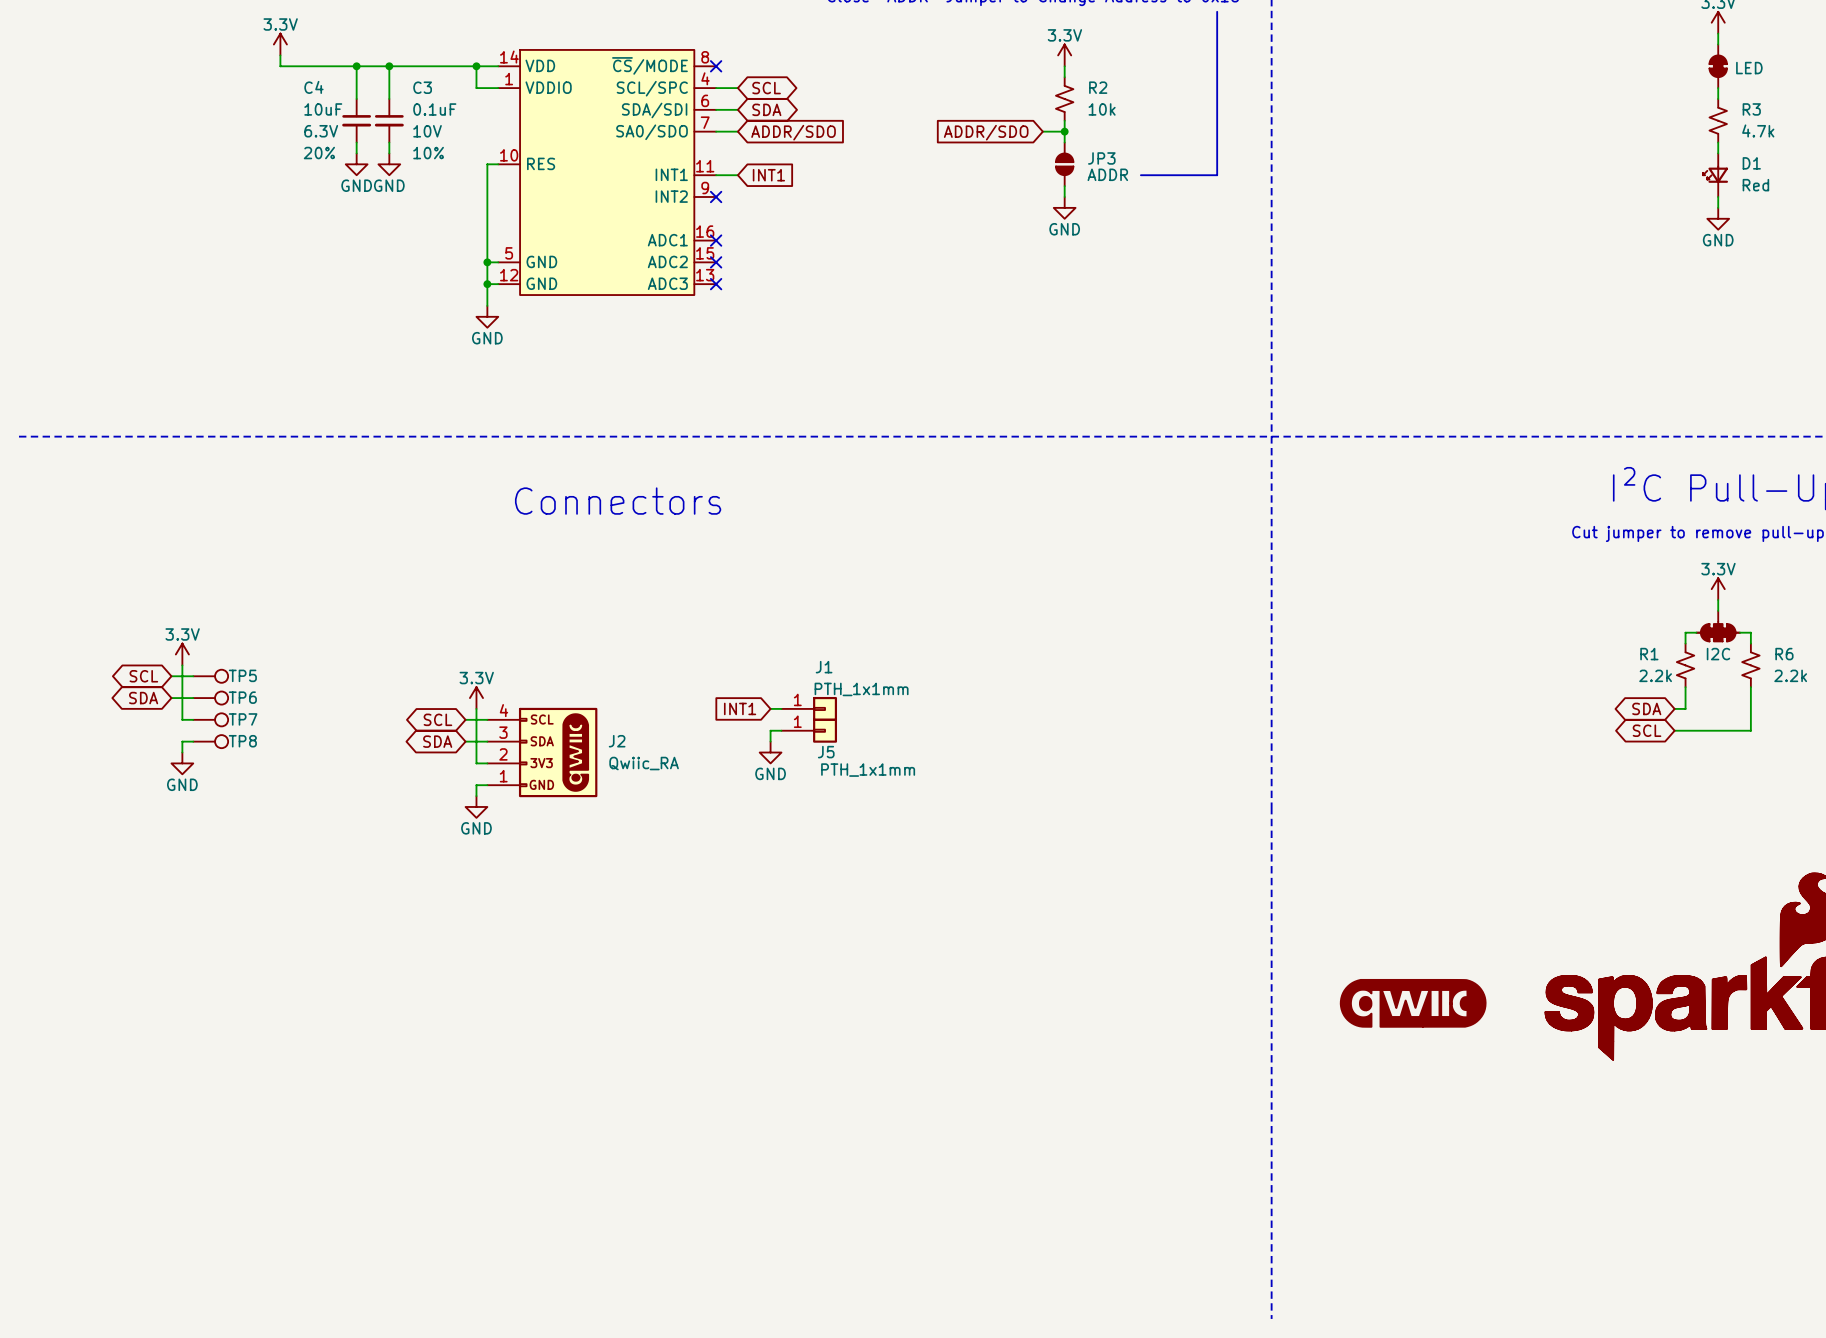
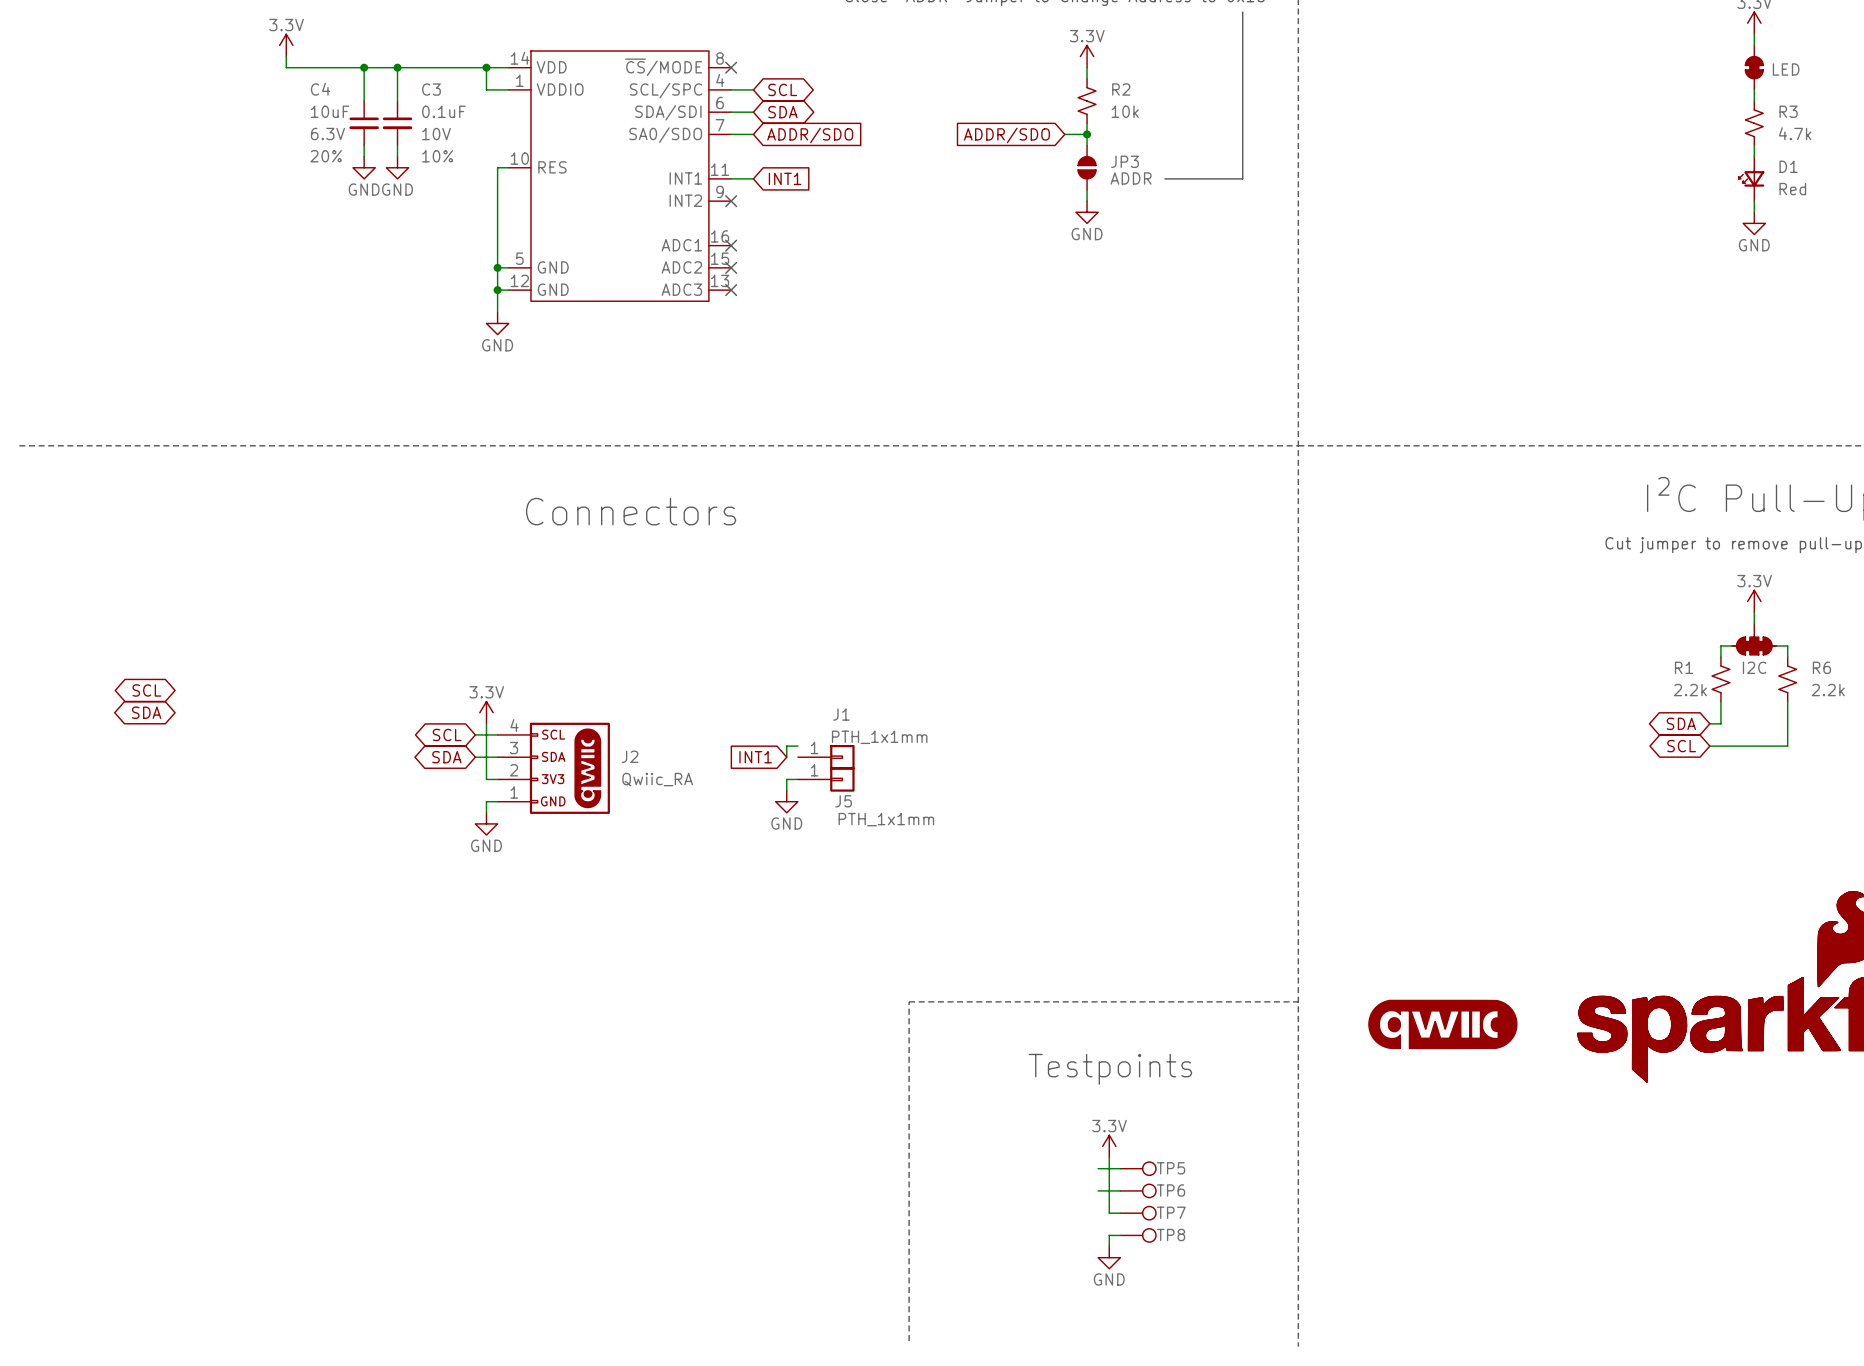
power symbol: 3.3V (182, 654) -> none
wire: (182, 665) (182, 719) (193, 719) -> none
wire: (171, 676) (193, 676) -> none
TP5 position: (210, 676) -> (1138, 1168)
wire: (171, 698) (193, 698) -> none
TP6 position: (210, 698) -> (1138, 1190)
global label position: INT1 (740, 708) -> INT1 (755, 757)
wire: (770, 708) (781, 708) -> none
J1 position: (809, 708) -> (826, 757)
TP7 position: (210, 719) -> (1138, 1213)
J5 position: (809, 730) -> (826, 779)
wire: (193, 741) (182, 741) (182, 752) -> none
TP8 position: (210, 741) -> (1138, 1235)
power symbol position: GND (770, 752) -> GND (786, 801)
power symbol: GND (182, 763) -> none
wire: none -> (797, 779) (786, 779) (786, 790)
line: none -> (1298, 1001) (909, 1001) (909, 1341)
text: none -> Testpoints (1110, 1069)
power symbol: none -> 3.3V (1109, 1146)
wire: none -> (1109, 1157) (1109, 1213) (1120, 1213)
wire: none -> (1098, 1168) (1120, 1168)
wire: none -> (1098, 1190) (1120, 1190)
wire: none -> (1120, 1235) (1109, 1235) (1109, 1246)
power symbol: none -> GND (1109, 1257)

